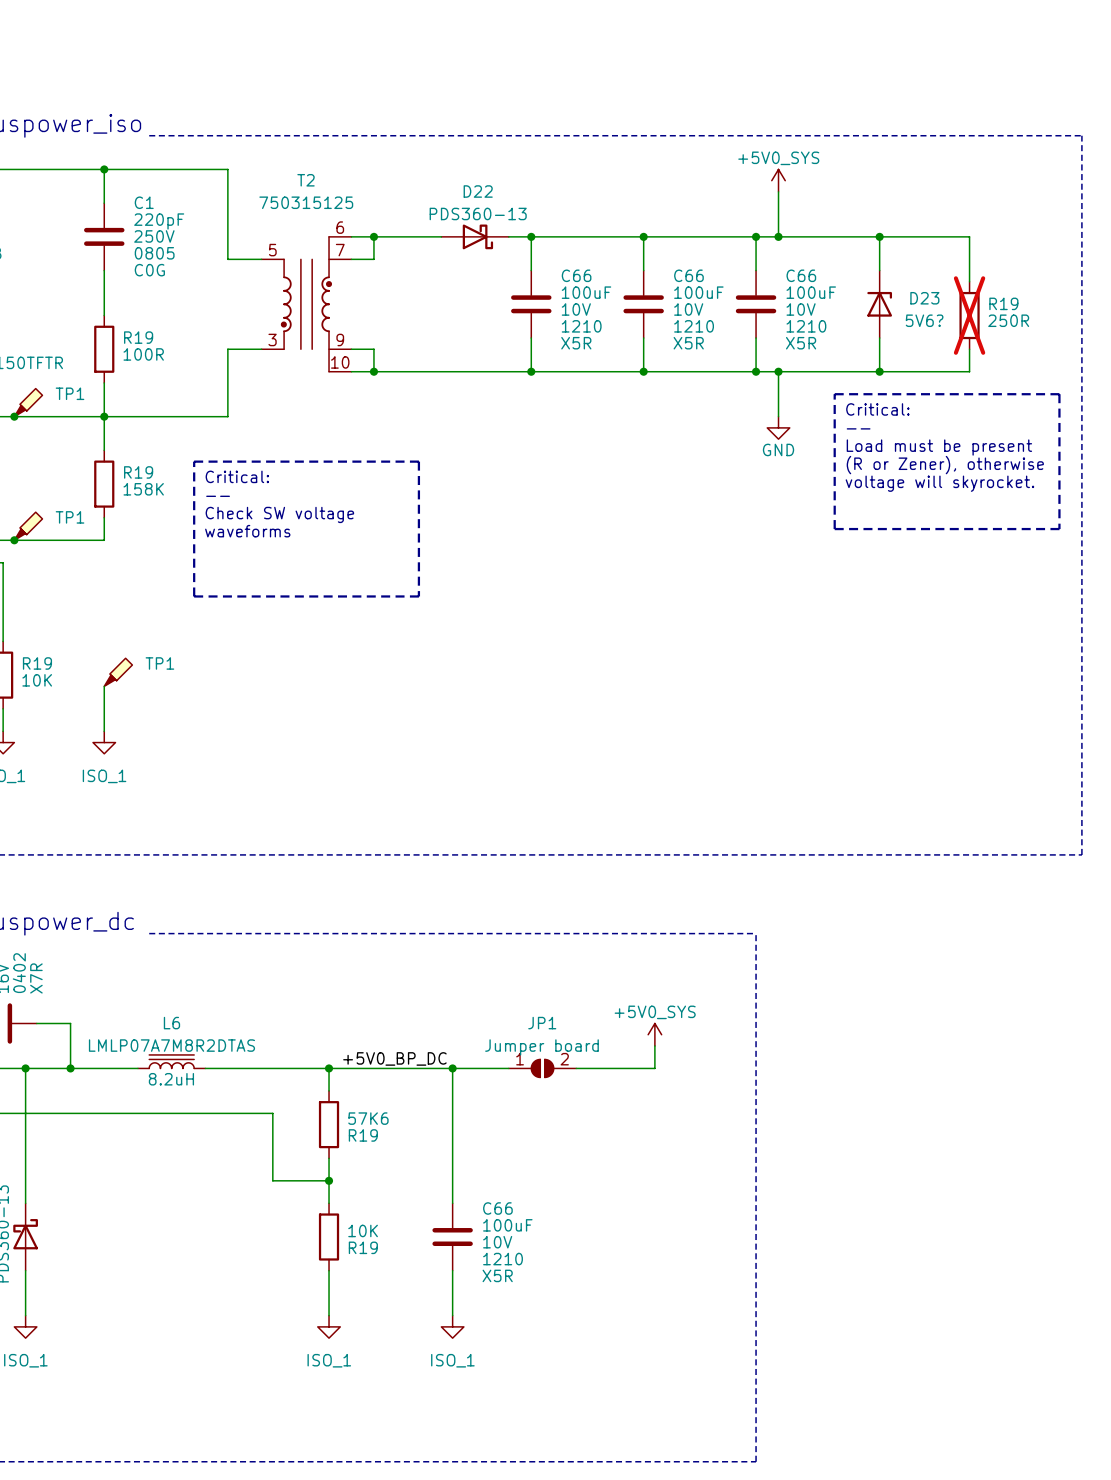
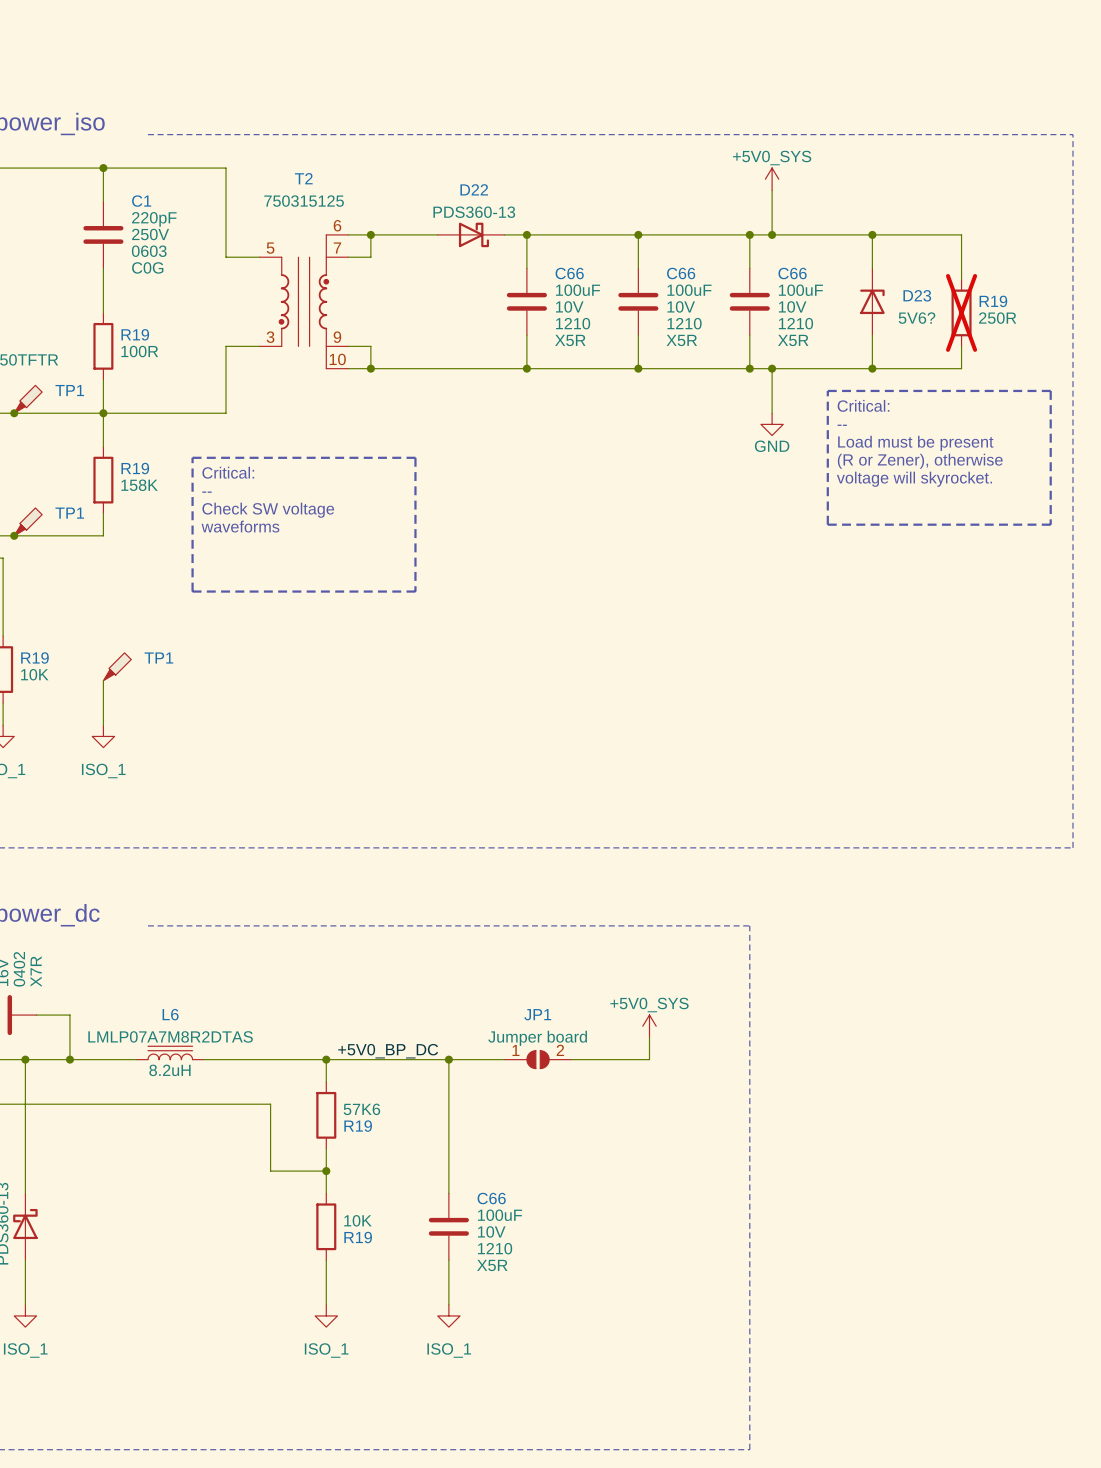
C1 text: 0805 (154, 253) -> 0603 (149, 251)

